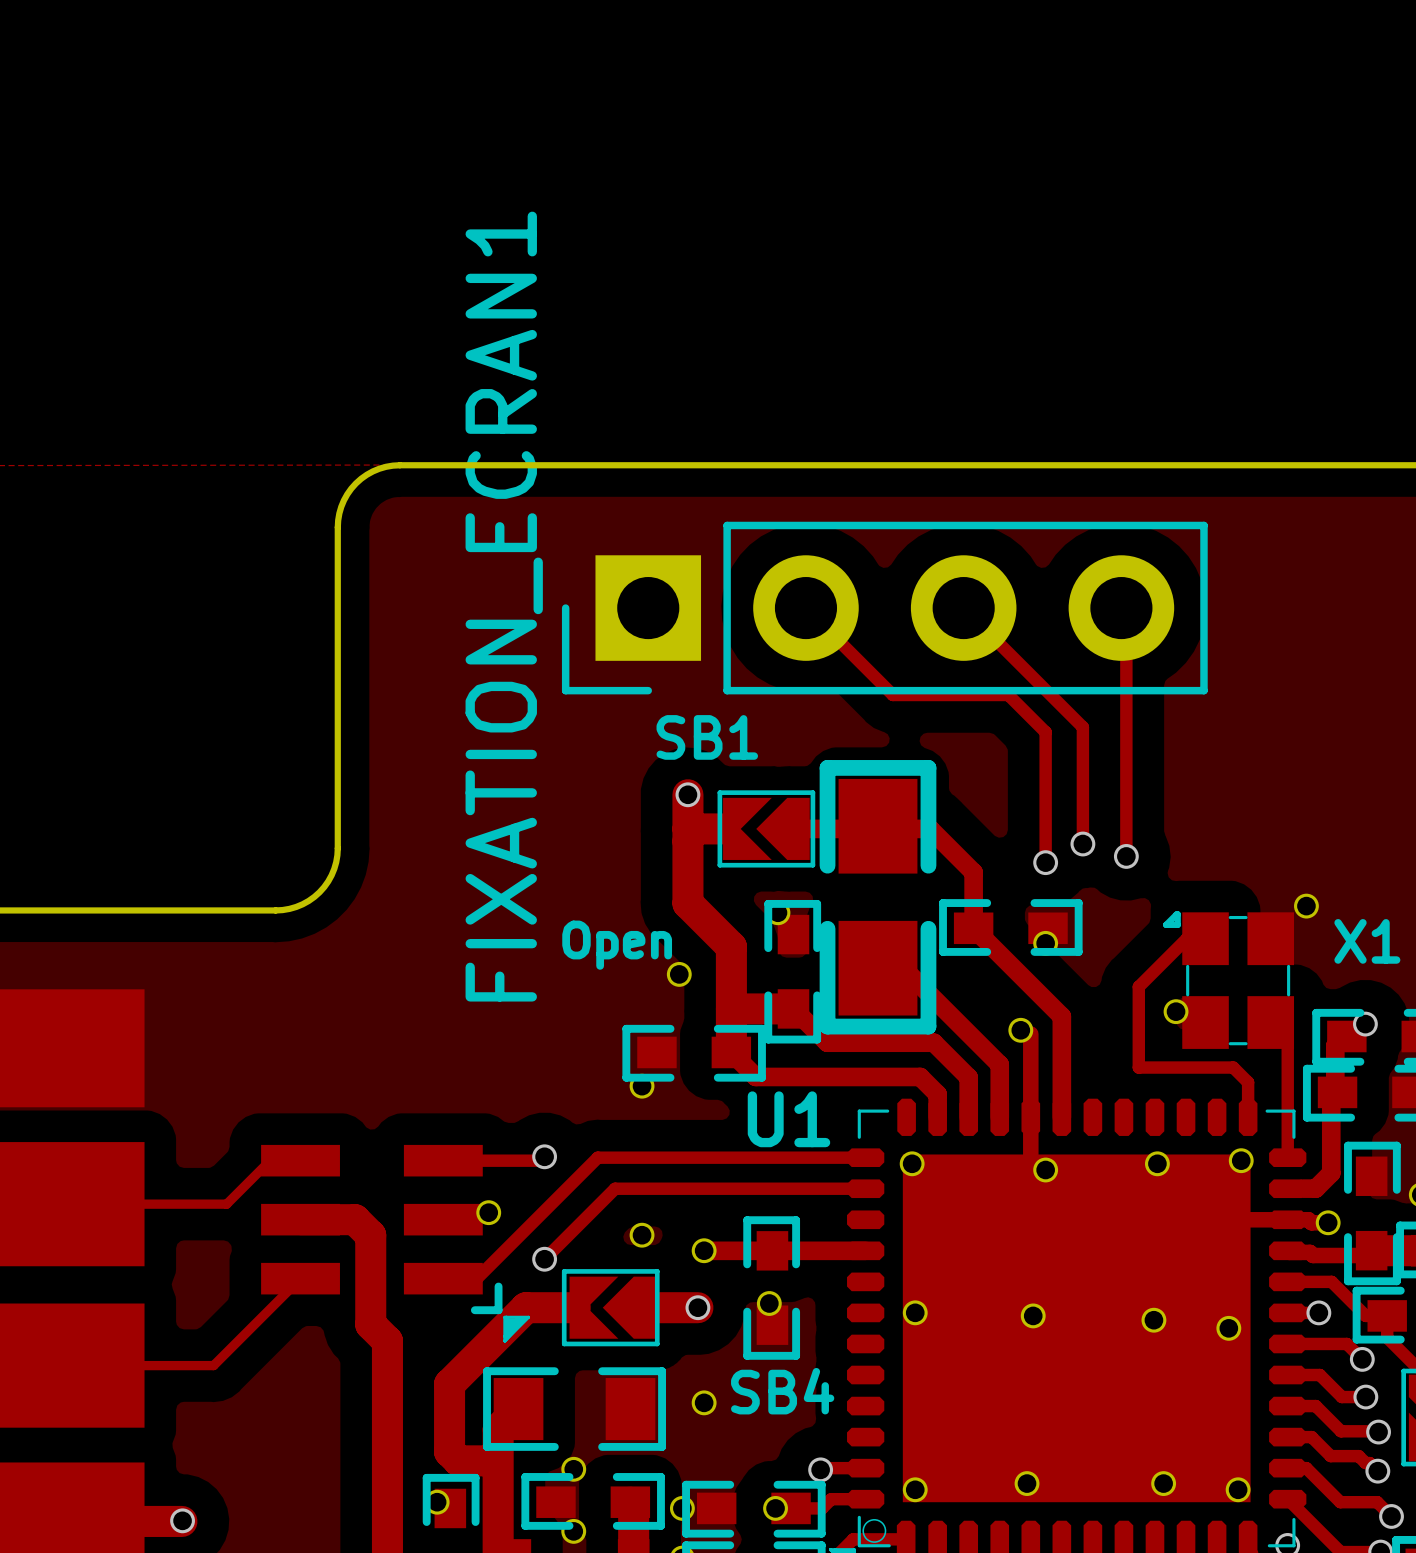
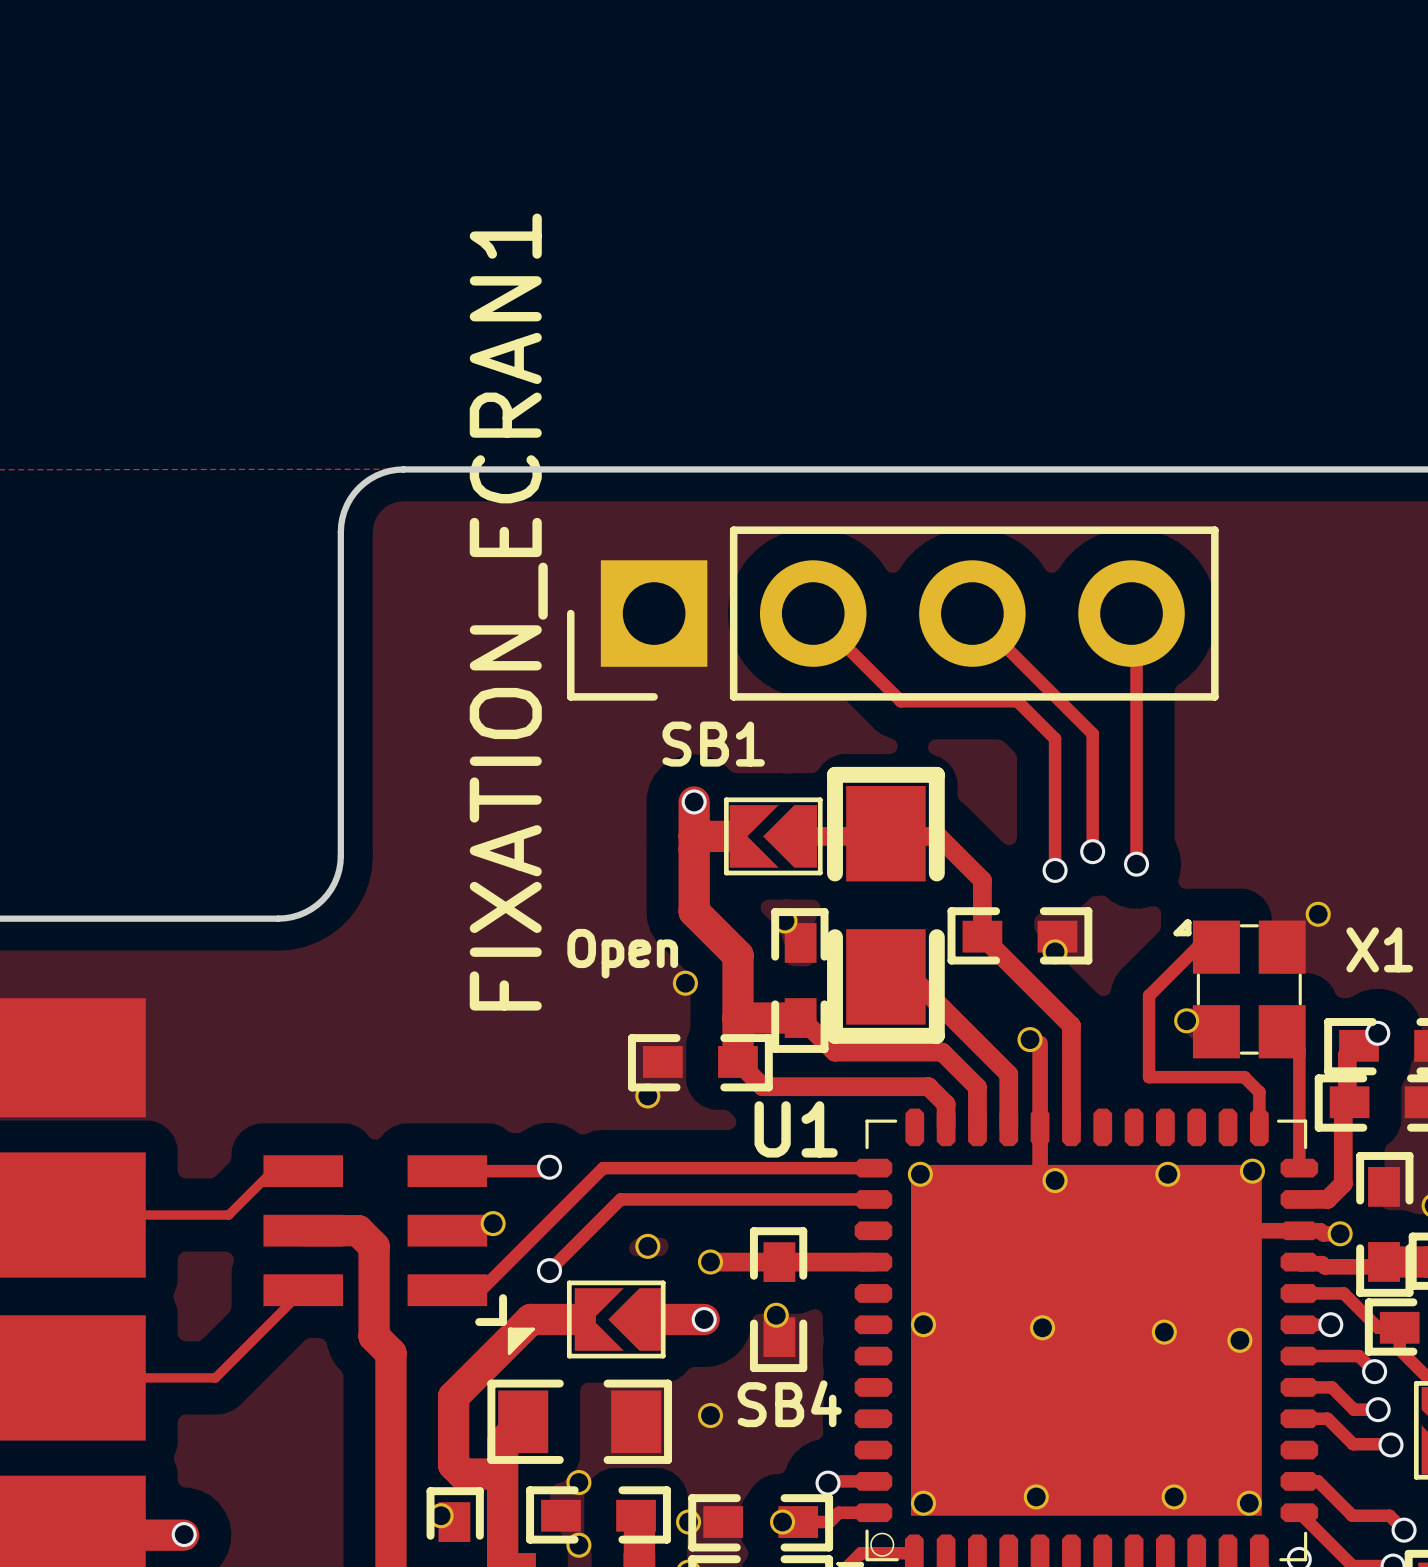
track: (1287, 1437) (1311, 1437) (1330, 1456) (1358, 1456) (1377, 1471) -> none
via: (1377, 1471) -> none

